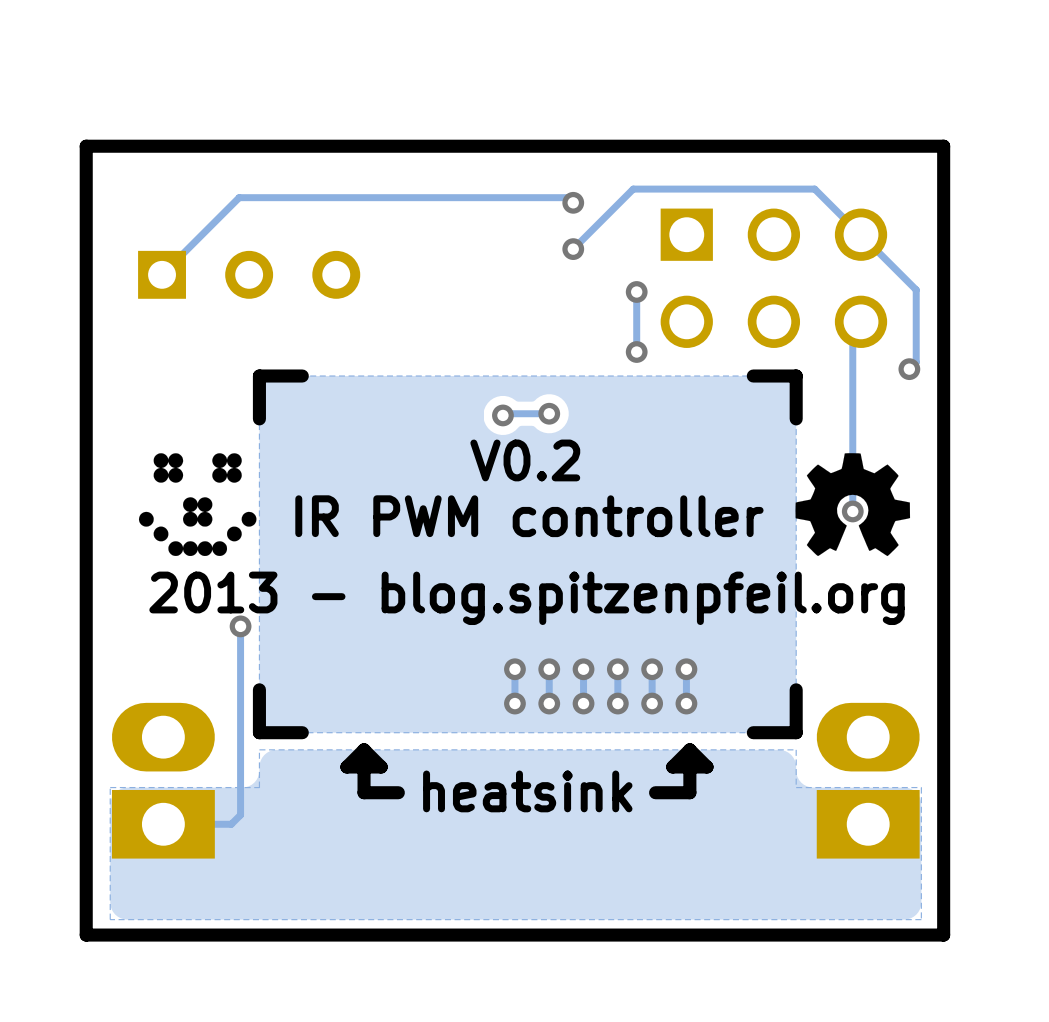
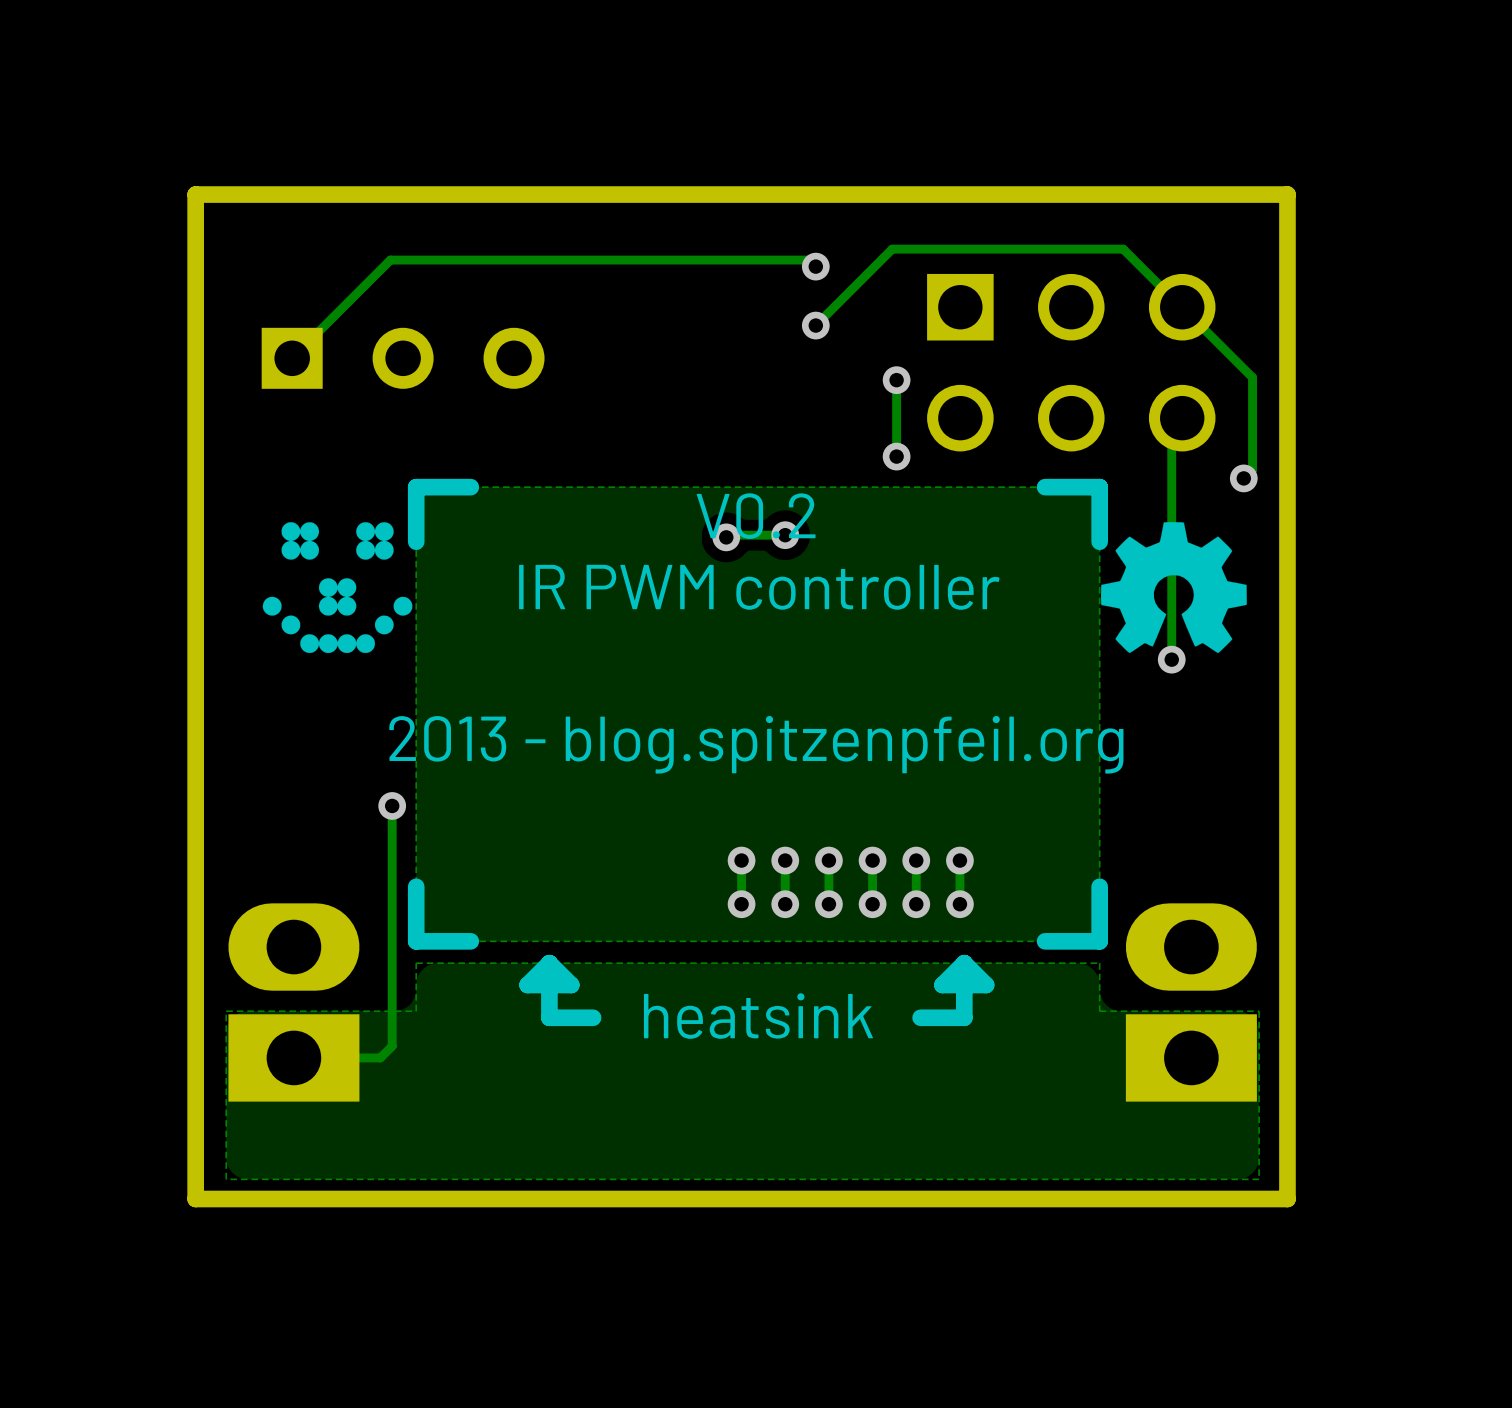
text position: V0.2 (525, 460) -> V0.2 (756, 516)
drawing position: (197, 504) -> (337, 587)
drawing position: (852, 504) -> (1173, 587)
text position: IR PWM controller (529, 516) -> IR PWM controller (759, 587)
text position: 2013 - blog.spitzenpfeil.org (527, 598) -> 2013 - blog.spitzenpfeil.org (756, 744)

